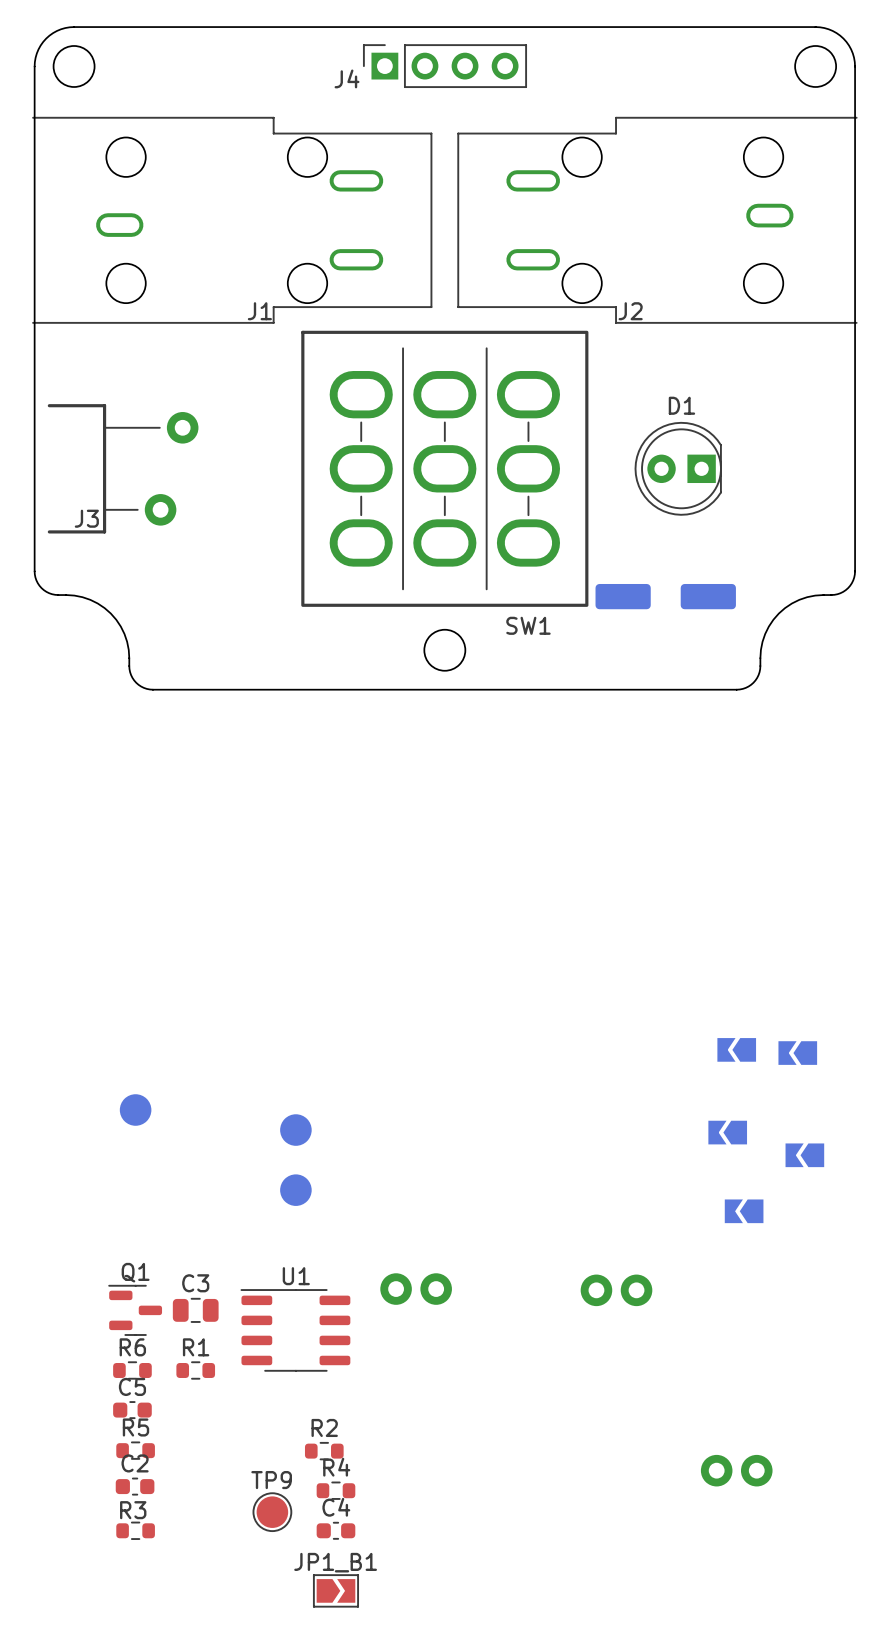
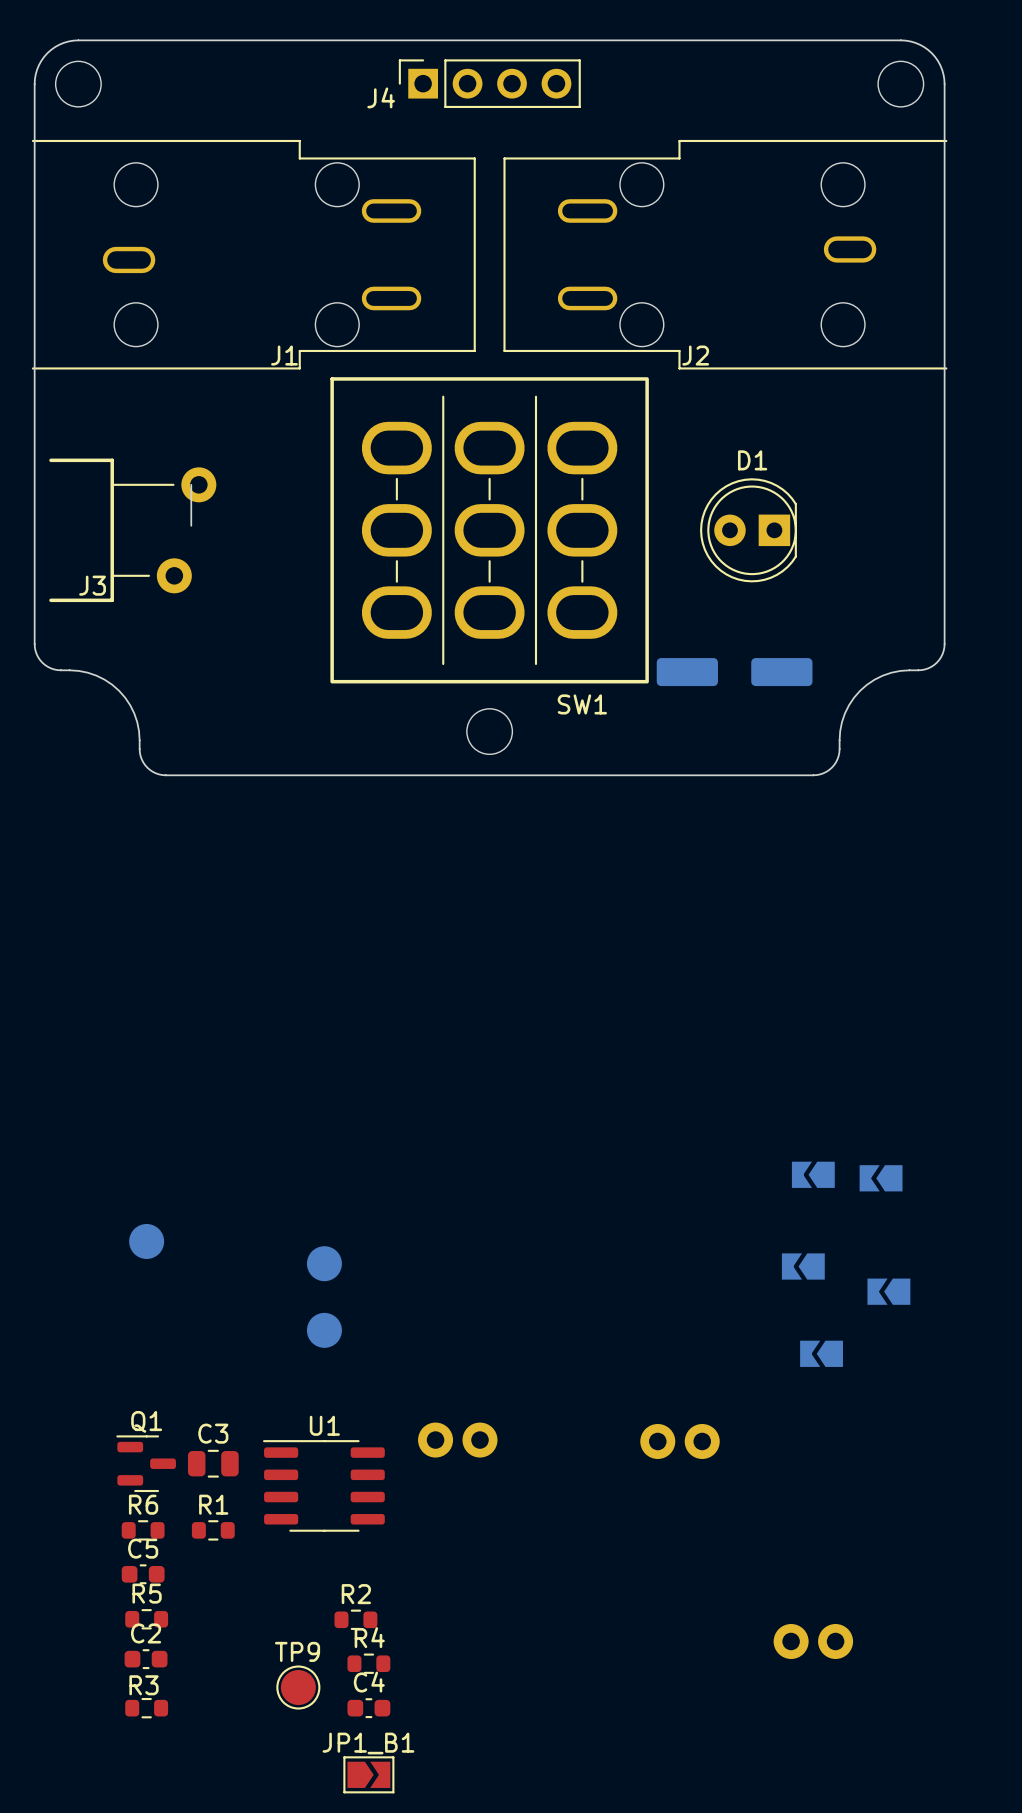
board edge: none -> (191, 484) (191, 525)

